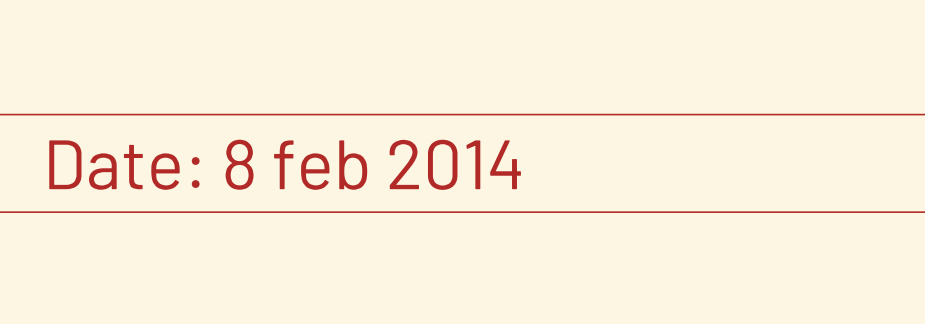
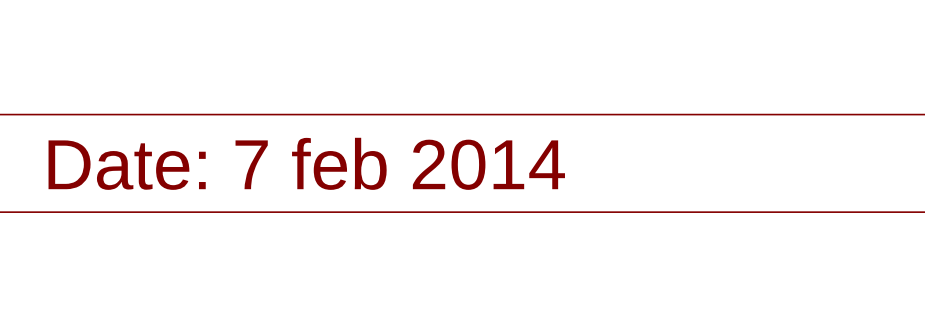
title block: Date: 8 feb 2014 (285, 164) -> Date: 7 feb 2014 (306, 163)

